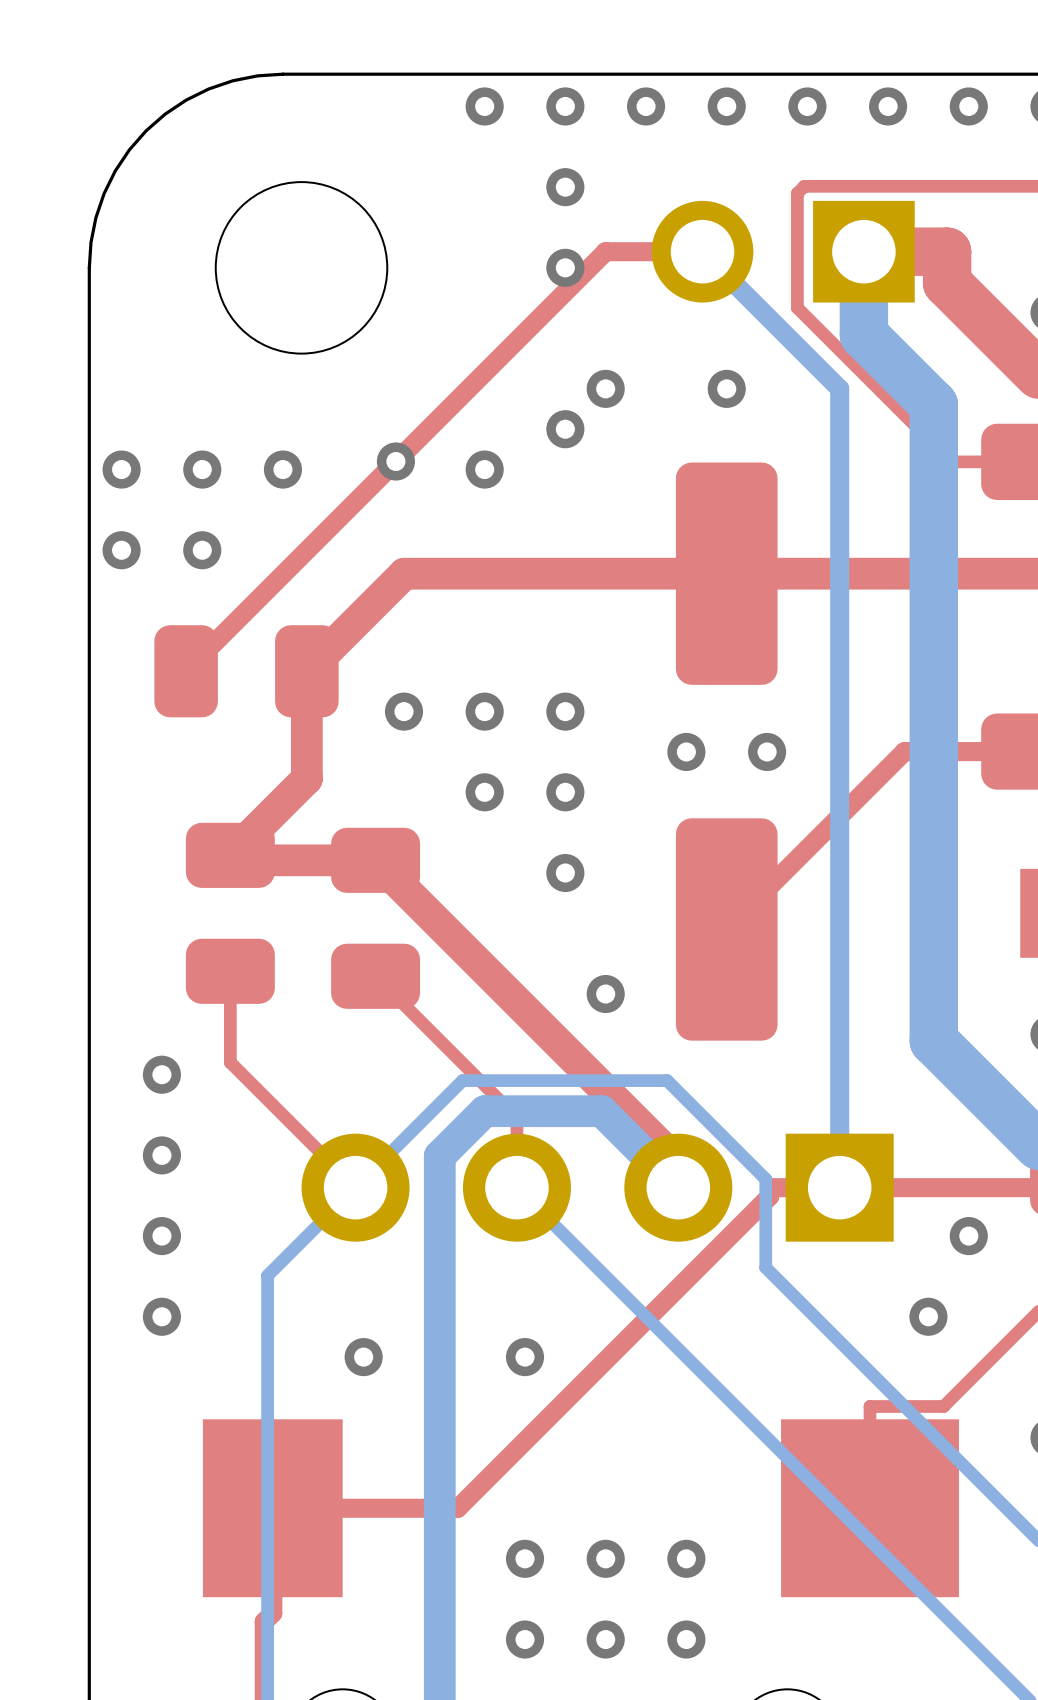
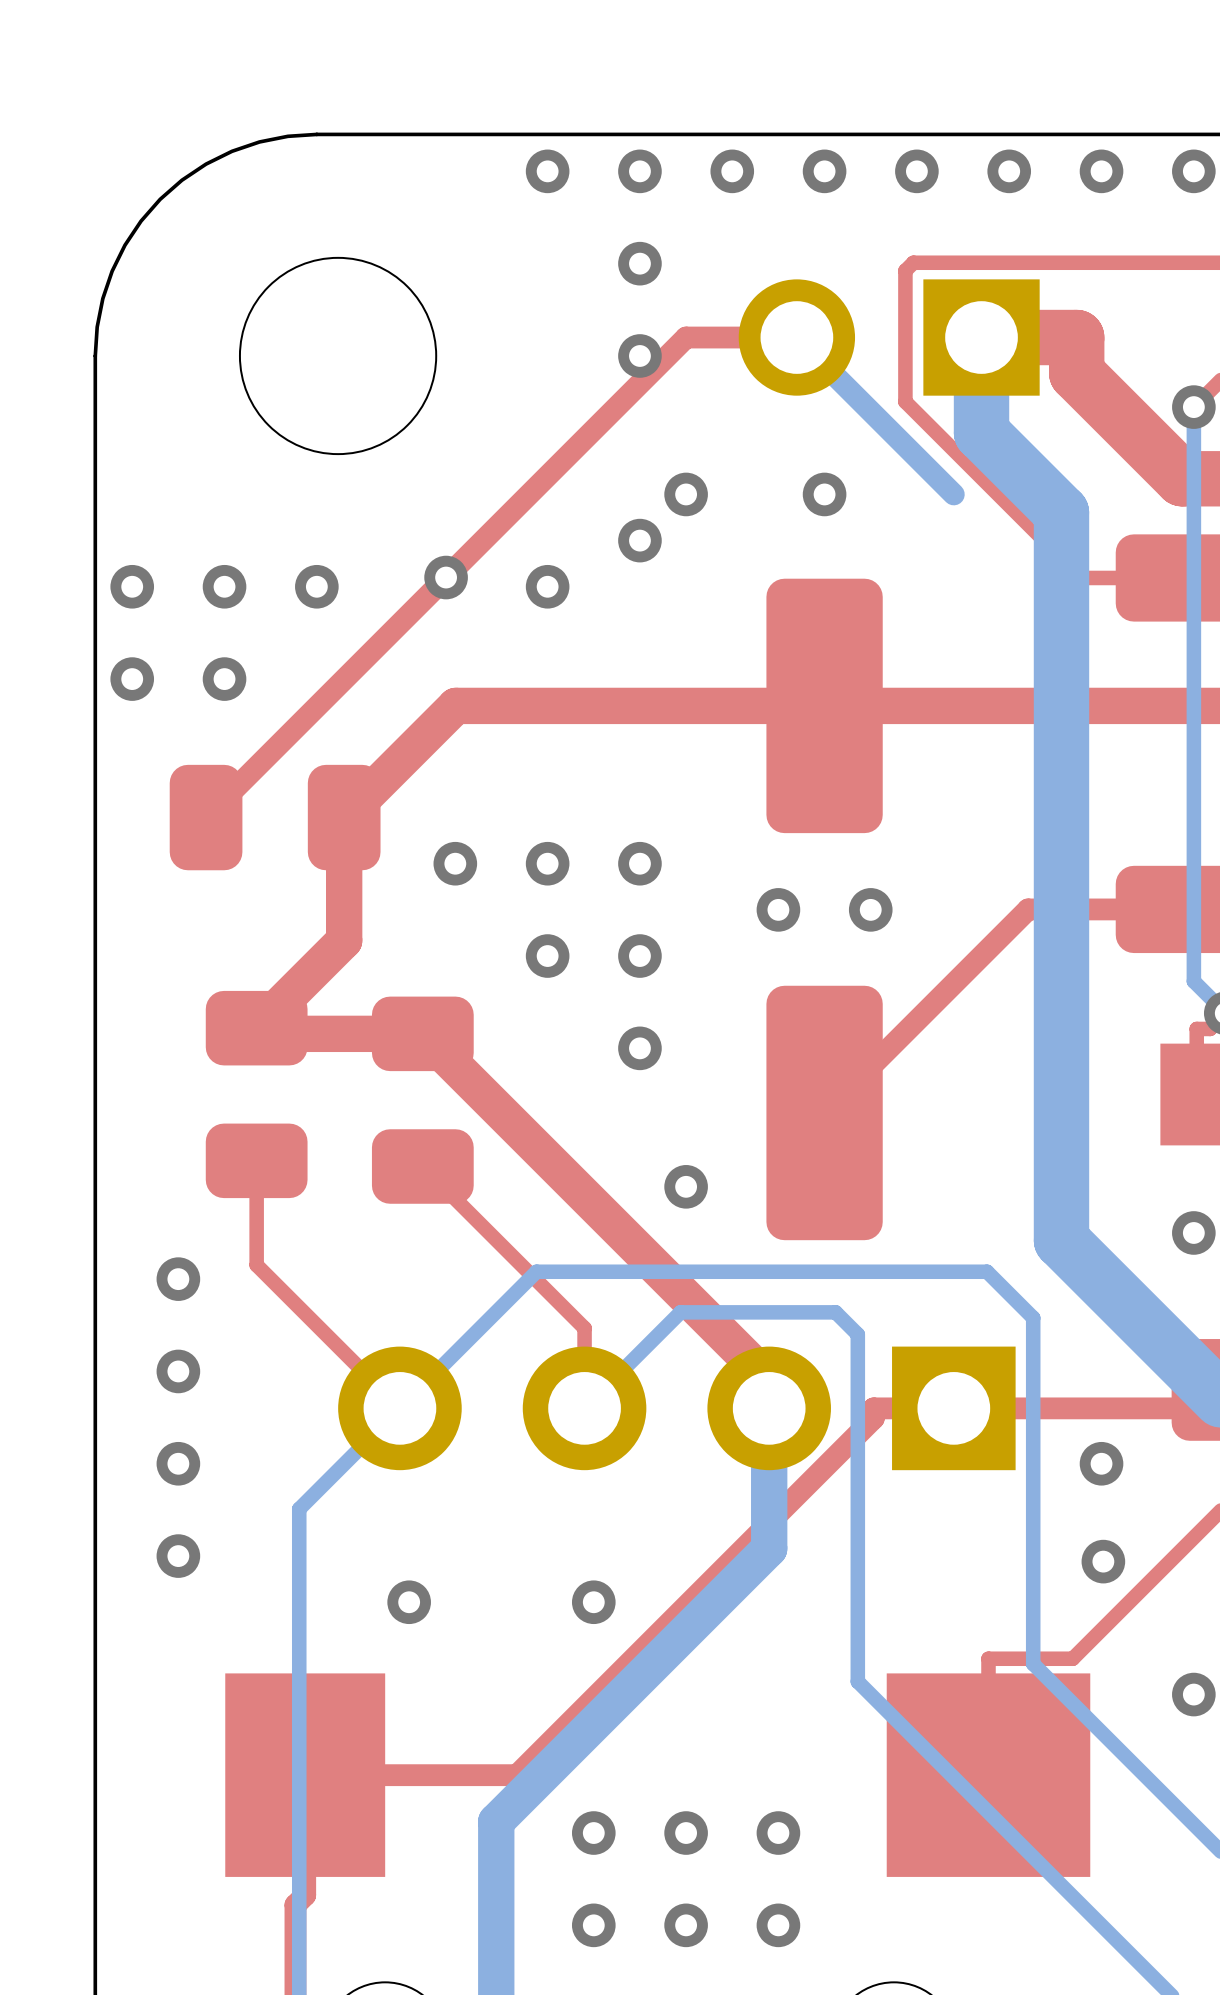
bottom track: (839, 388) (839, 1187) -> none
bottom track: (462, 1080) (667, 1080) (765, 1179) (765, 1267) (909, 1411) -> (522, 1285) (536, 1271) (987, 1271) (1033, 1317) (1033, 1663)
bottom track: (516, 1187) (755, 1426) -> (584, 1408) (680, 1312) (835, 1312) (857, 1334) (857, 1681)
bottom track: (678, 1187) (601, 1111) (484, 1111) (439, 1156) (439, 1548) -> (769, 1408) (769, 1548) (496, 1821)
via position: (928, 1316) -> (1103, 1561)

